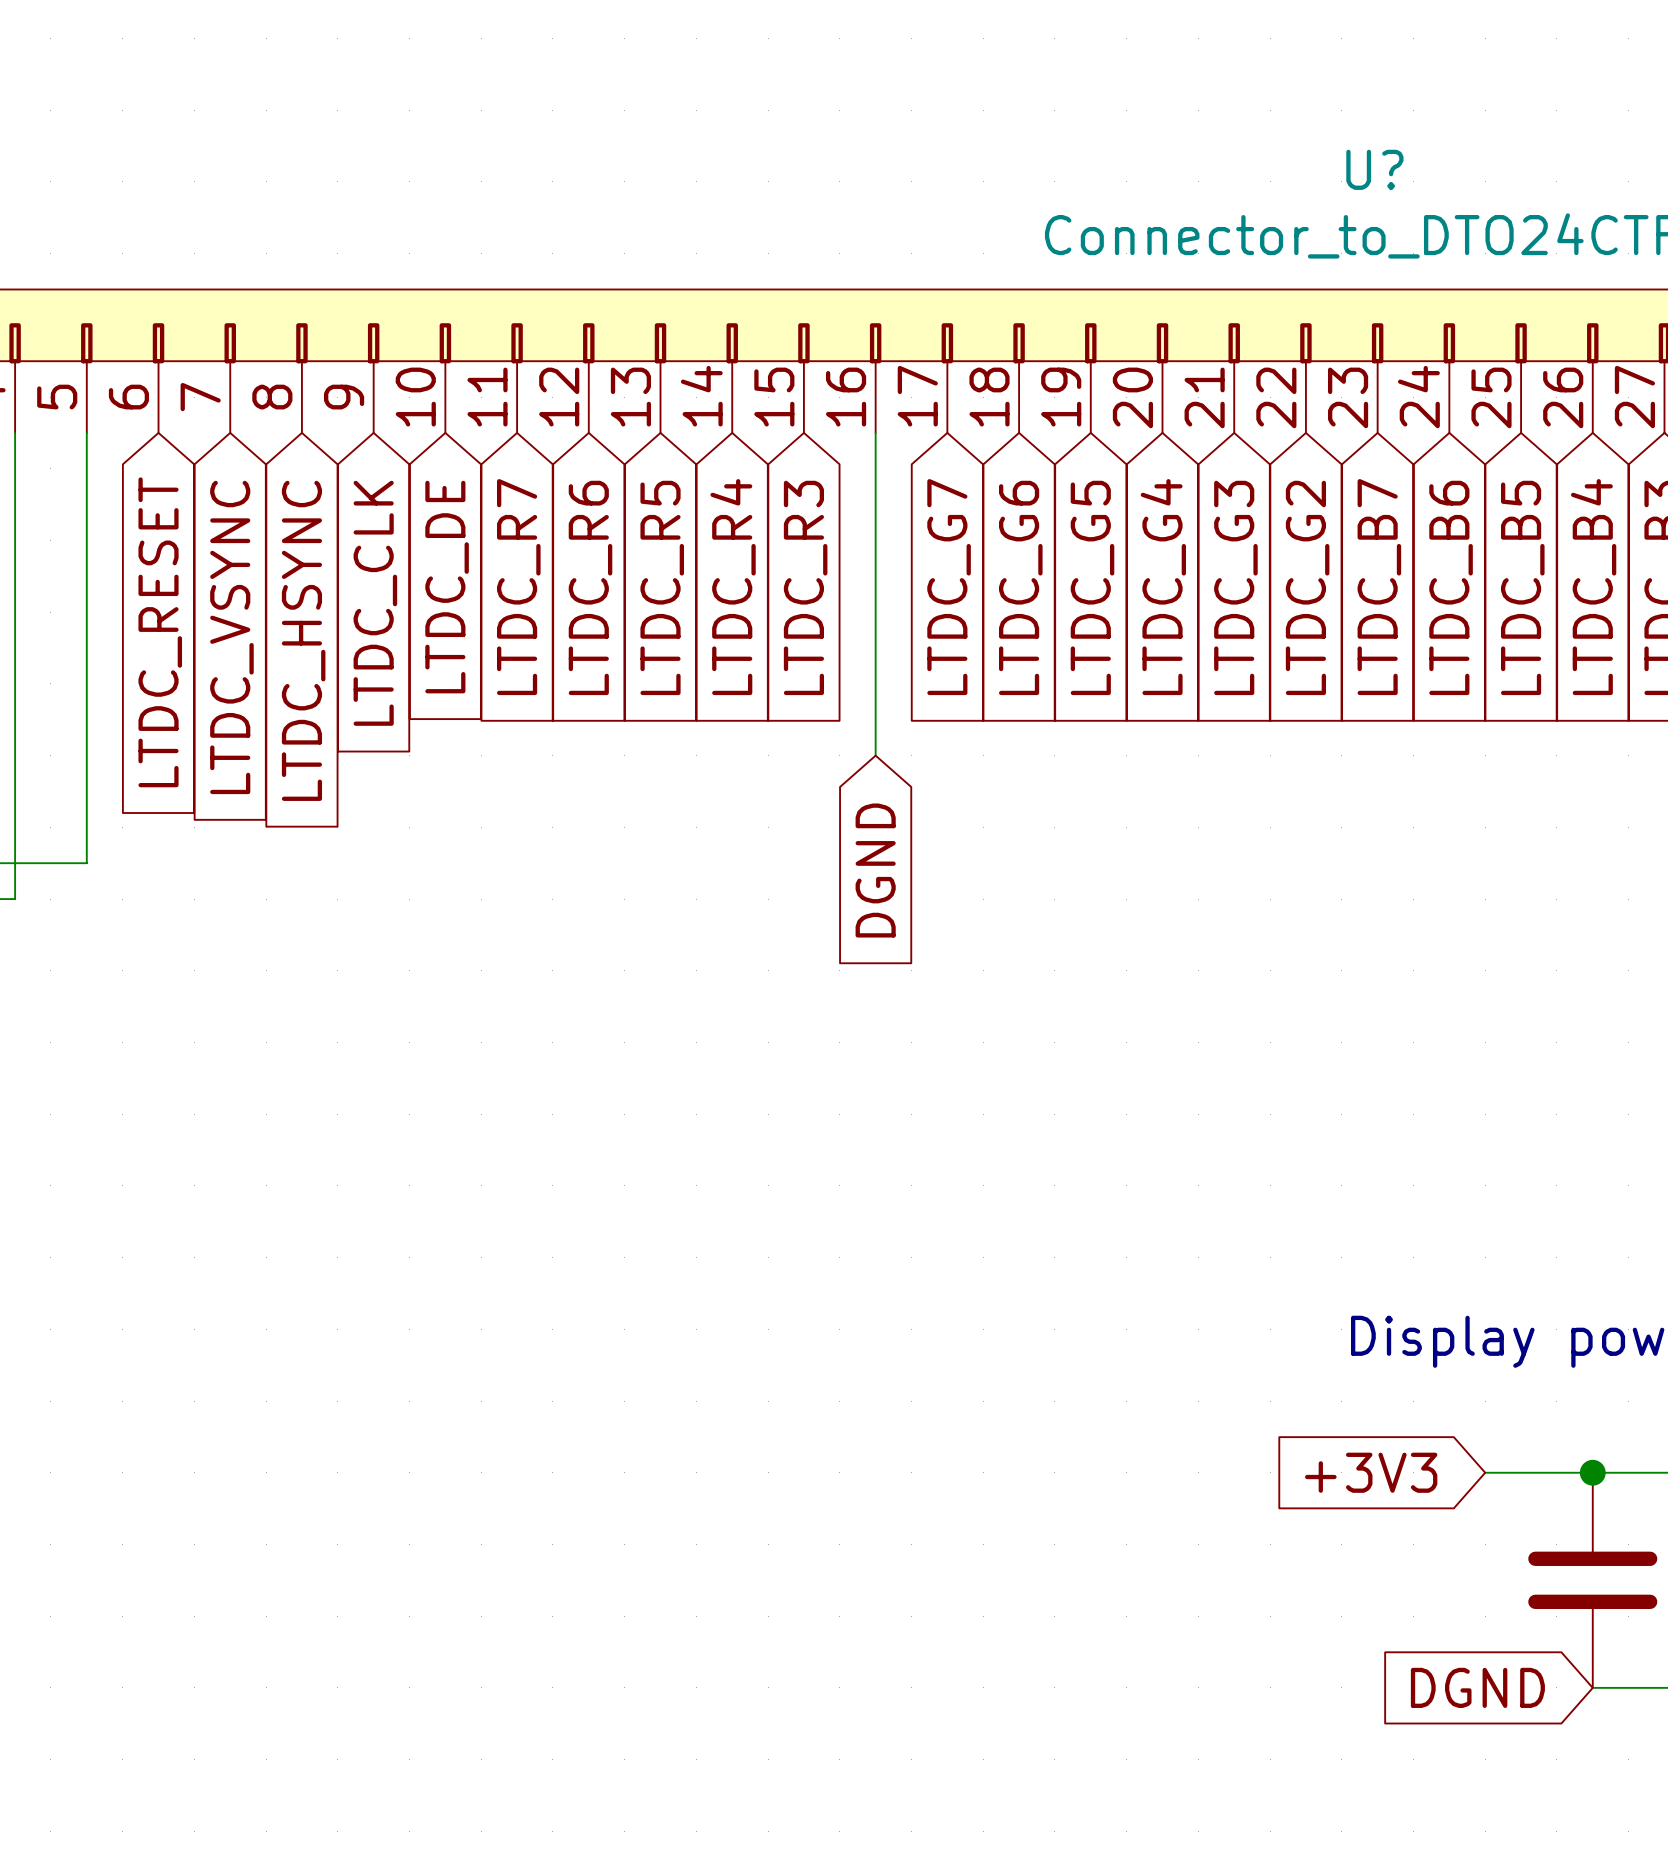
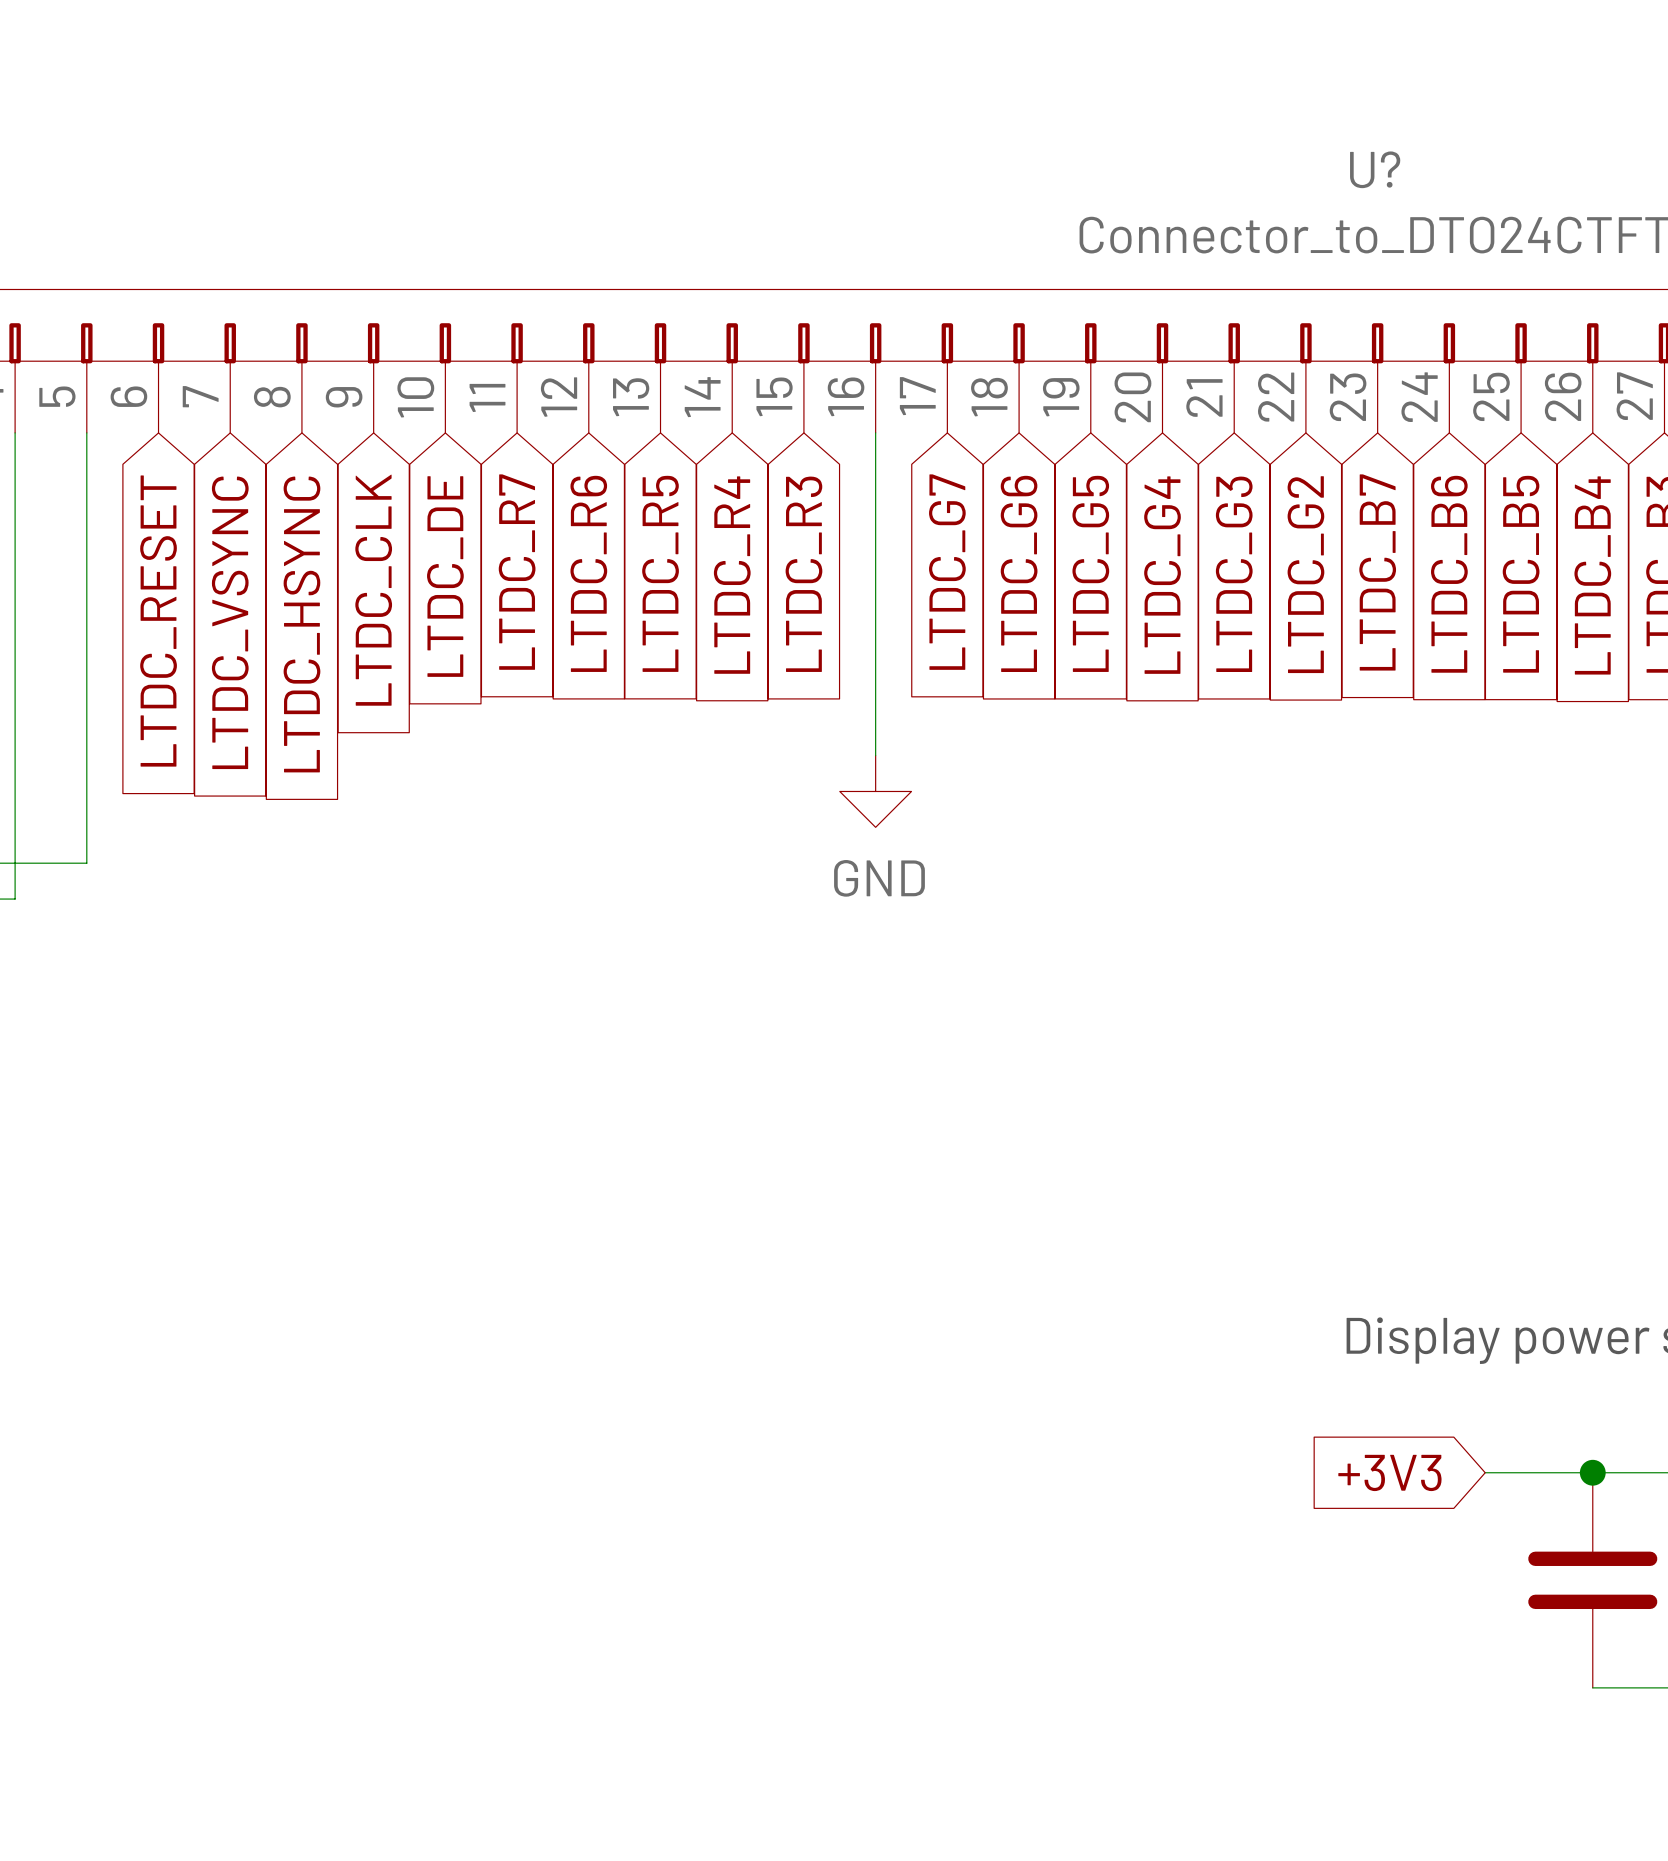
power symbol: none -> GND (875, 791)
global label: DGND (875, 870) -> none
global label: DGND (1477, 1687) -> none

